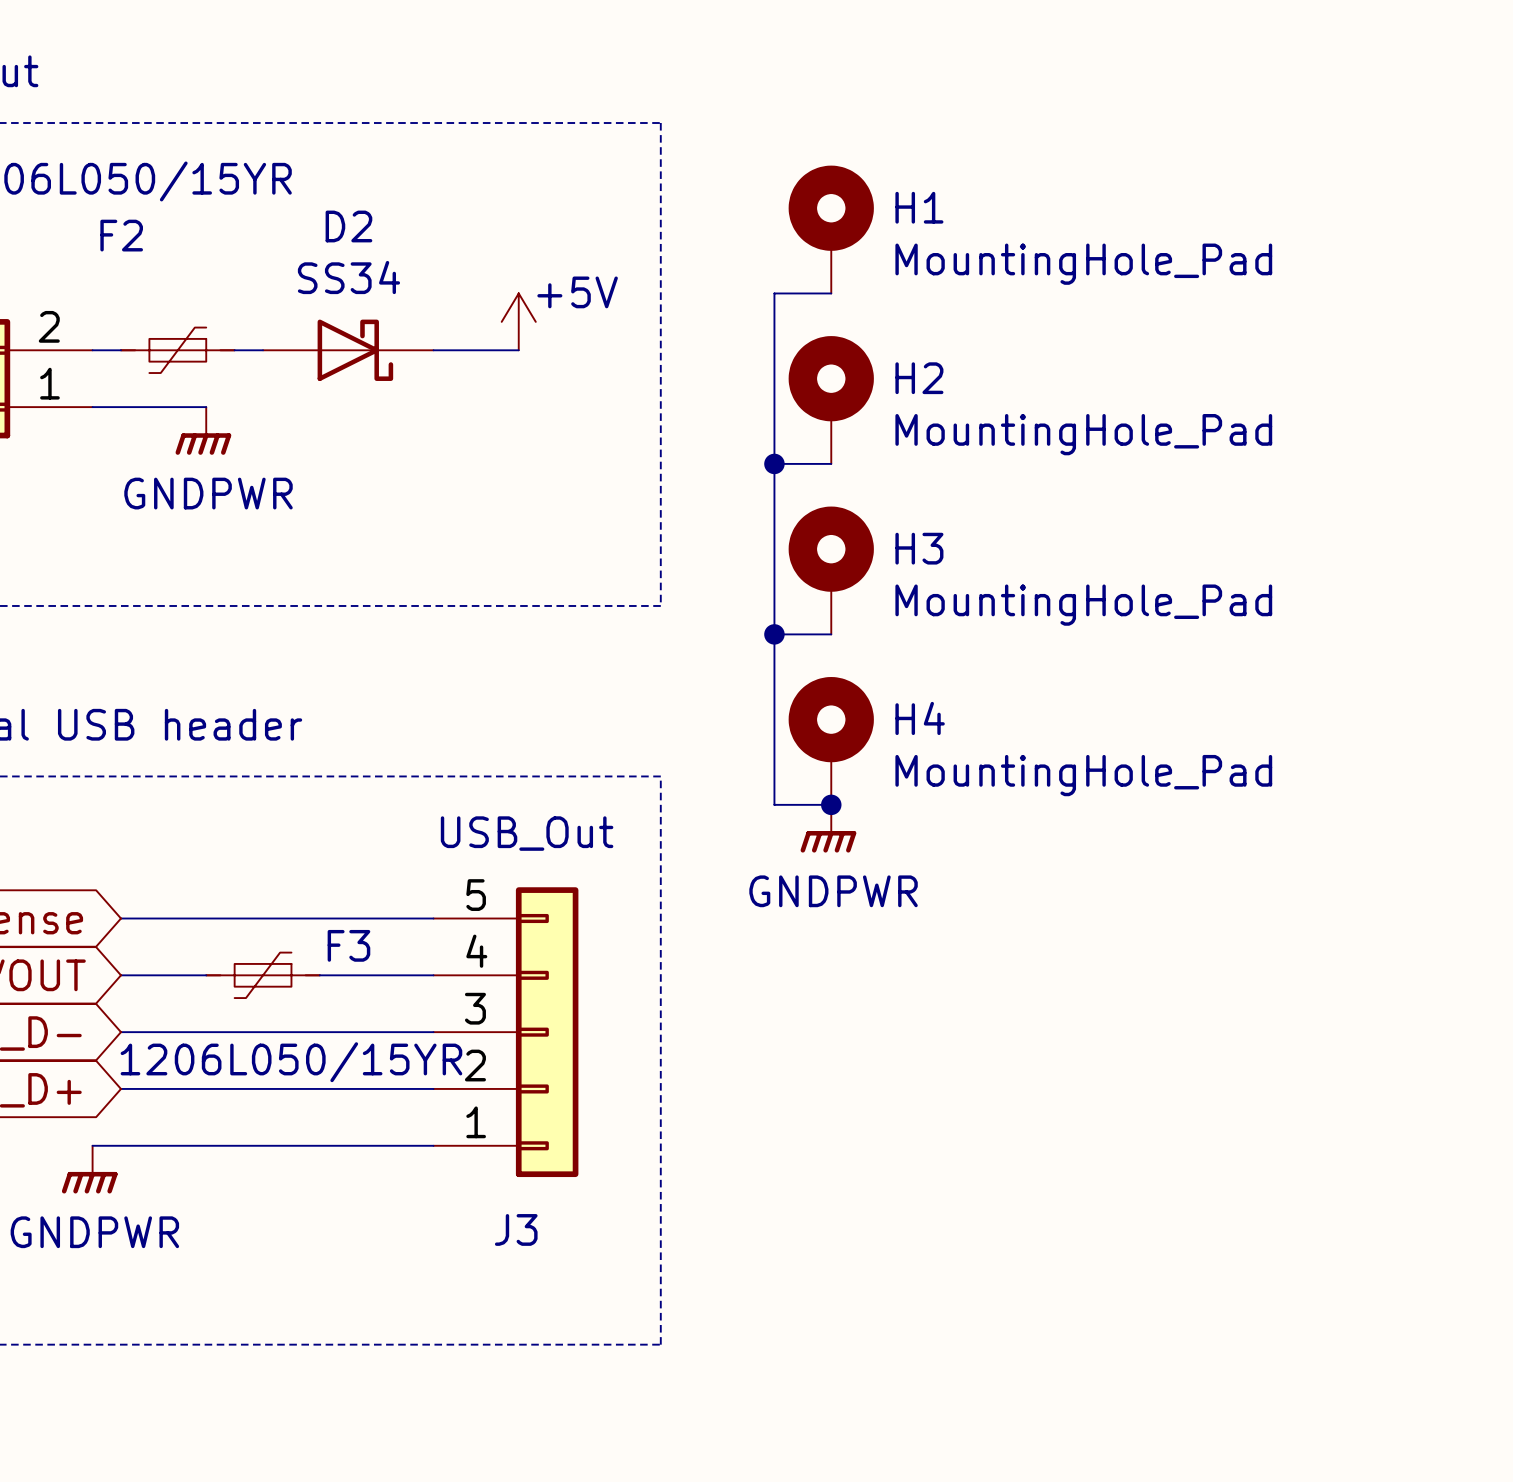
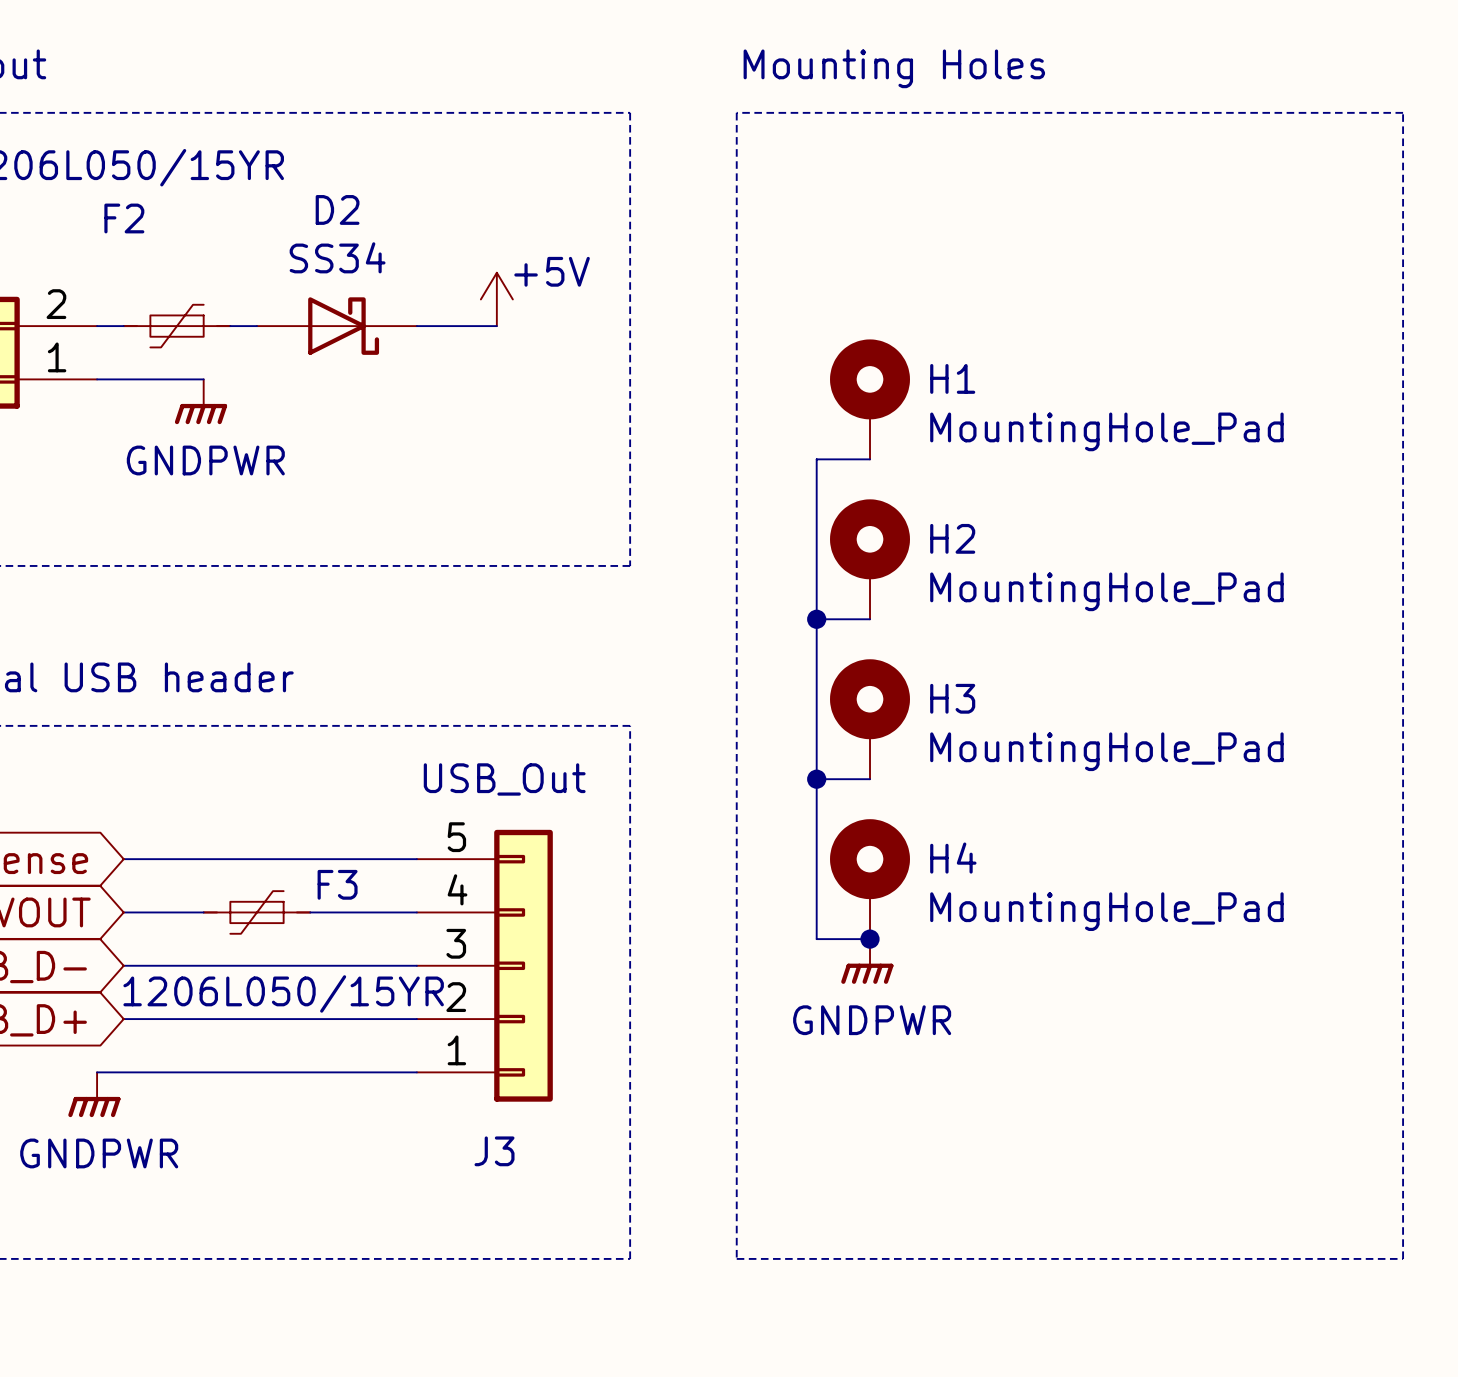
text: none -> Mounting Holes (894, 68)
line: none -> (736, 112) (736, 1258) (1403, 1258) (1403, 112) (736, 112)
H1 position: (831, 229) -> (870, 399)
wire: (831, 293) (774, 293) (774, 804) (831, 804) -> (870, 459) (816, 459) (816, 939) (870, 939)
H2 position: (831, 400) -> (870, 559)
wire: (774, 463) (831, 463) -> (816, 619) (870, 619)
junction: (774, 463) -> none
H3 position: (831, 570) -> (870, 719)
wire: (774, 634) (831, 634) -> (816, 779) (870, 779)
junction: (774, 634) -> none
junction: none -> (816, 619)
H4 position: (831, 740) -> (870, 879)
junction position: (831, 804) -> (816, 779)
power symbol position: GNDPWR (828, 828) -> GNDPWR (867, 961)
junction: none -> (870, 939)

